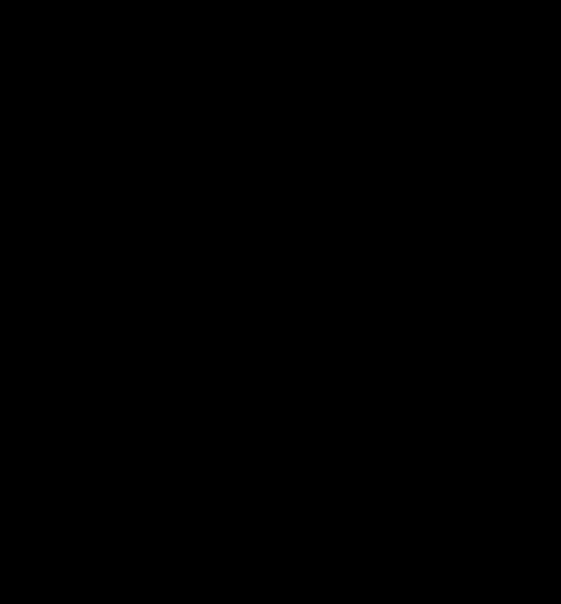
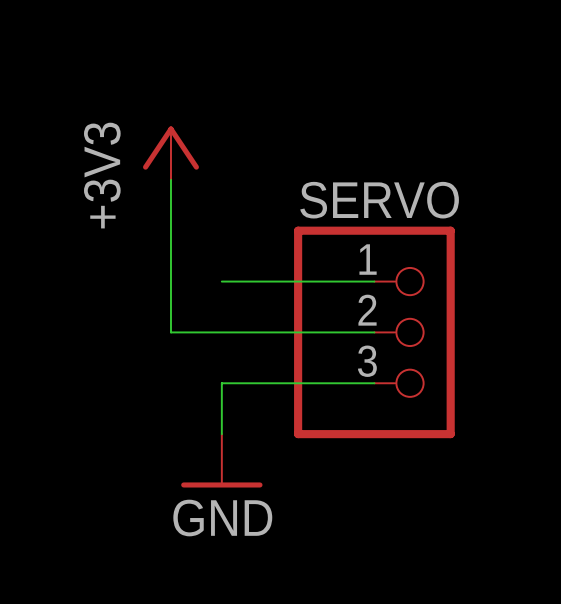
power symbol: none -> +3V3 (170, 153)
wire: none -> (170, 179) (170, 332) (374, 332)
wire: none -> (221, 281) (374, 281)
SERVO: none -> (374, 332)
wire: none -> (374, 383) (221, 383) (221, 434)
power symbol: none -> GND (221, 460)

